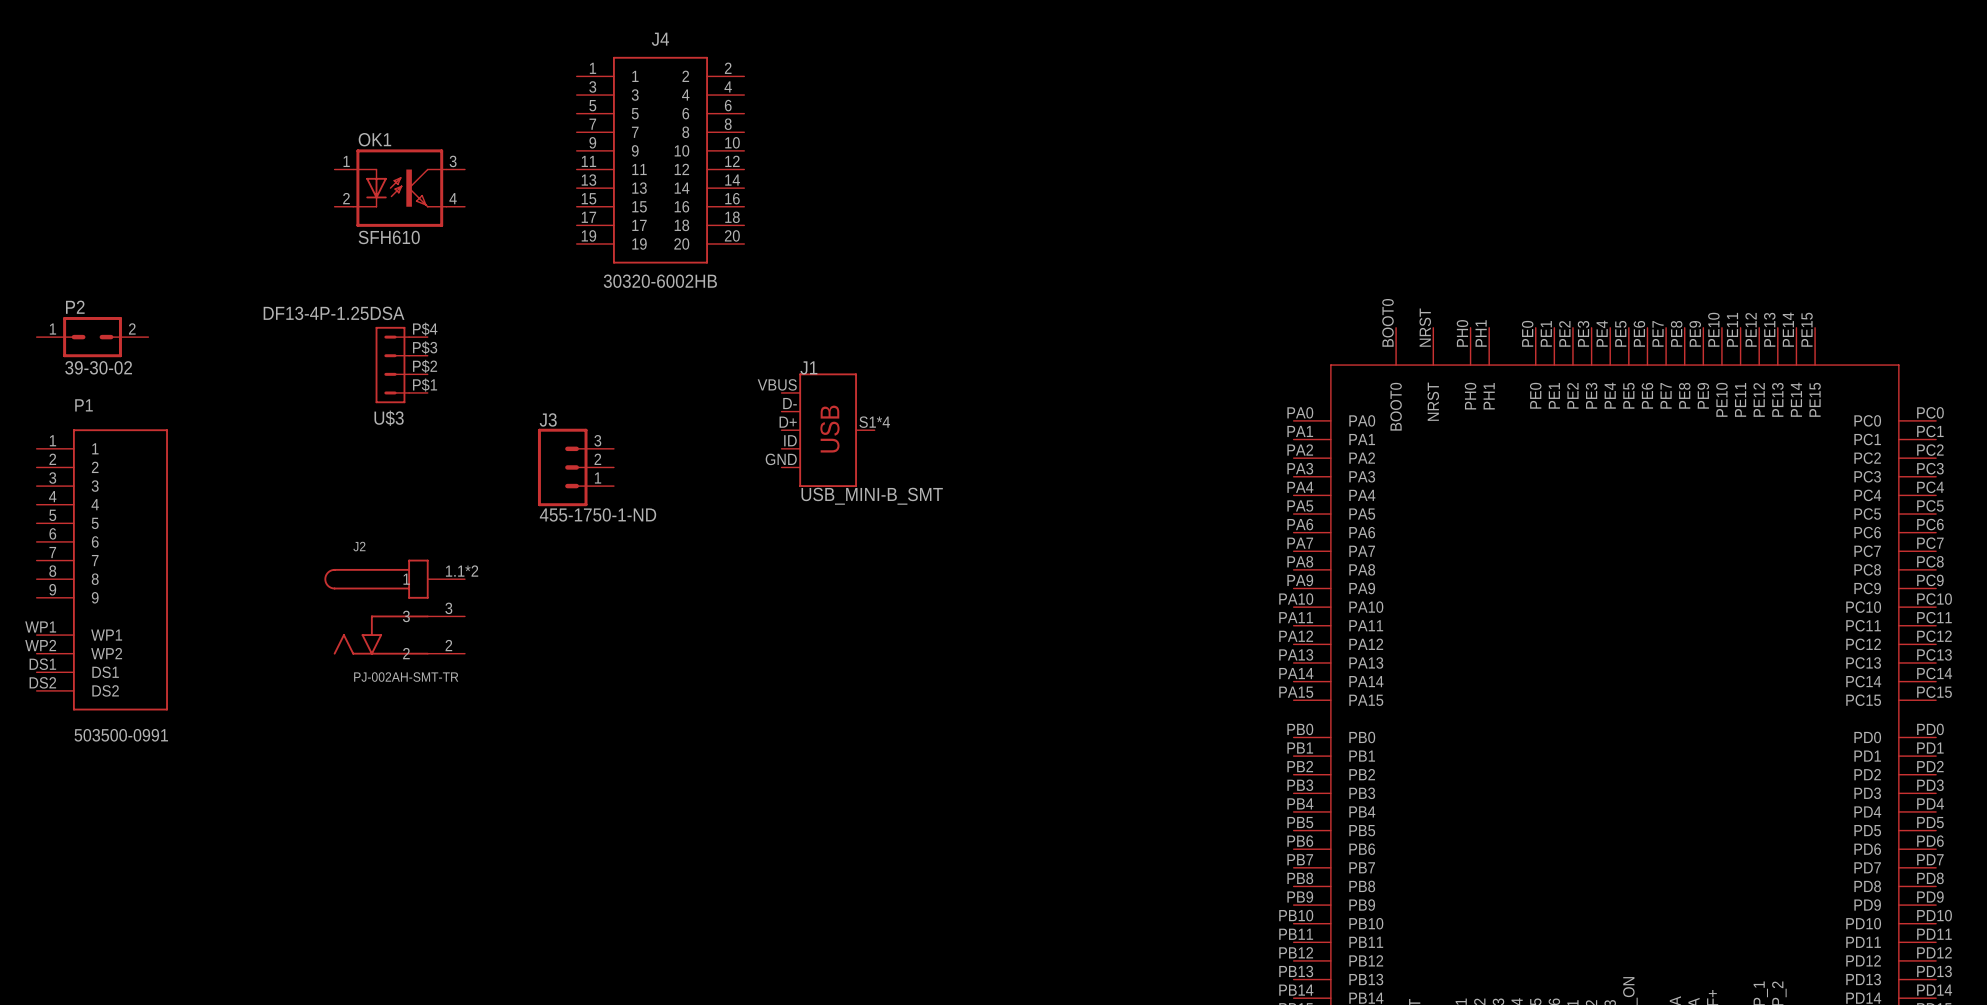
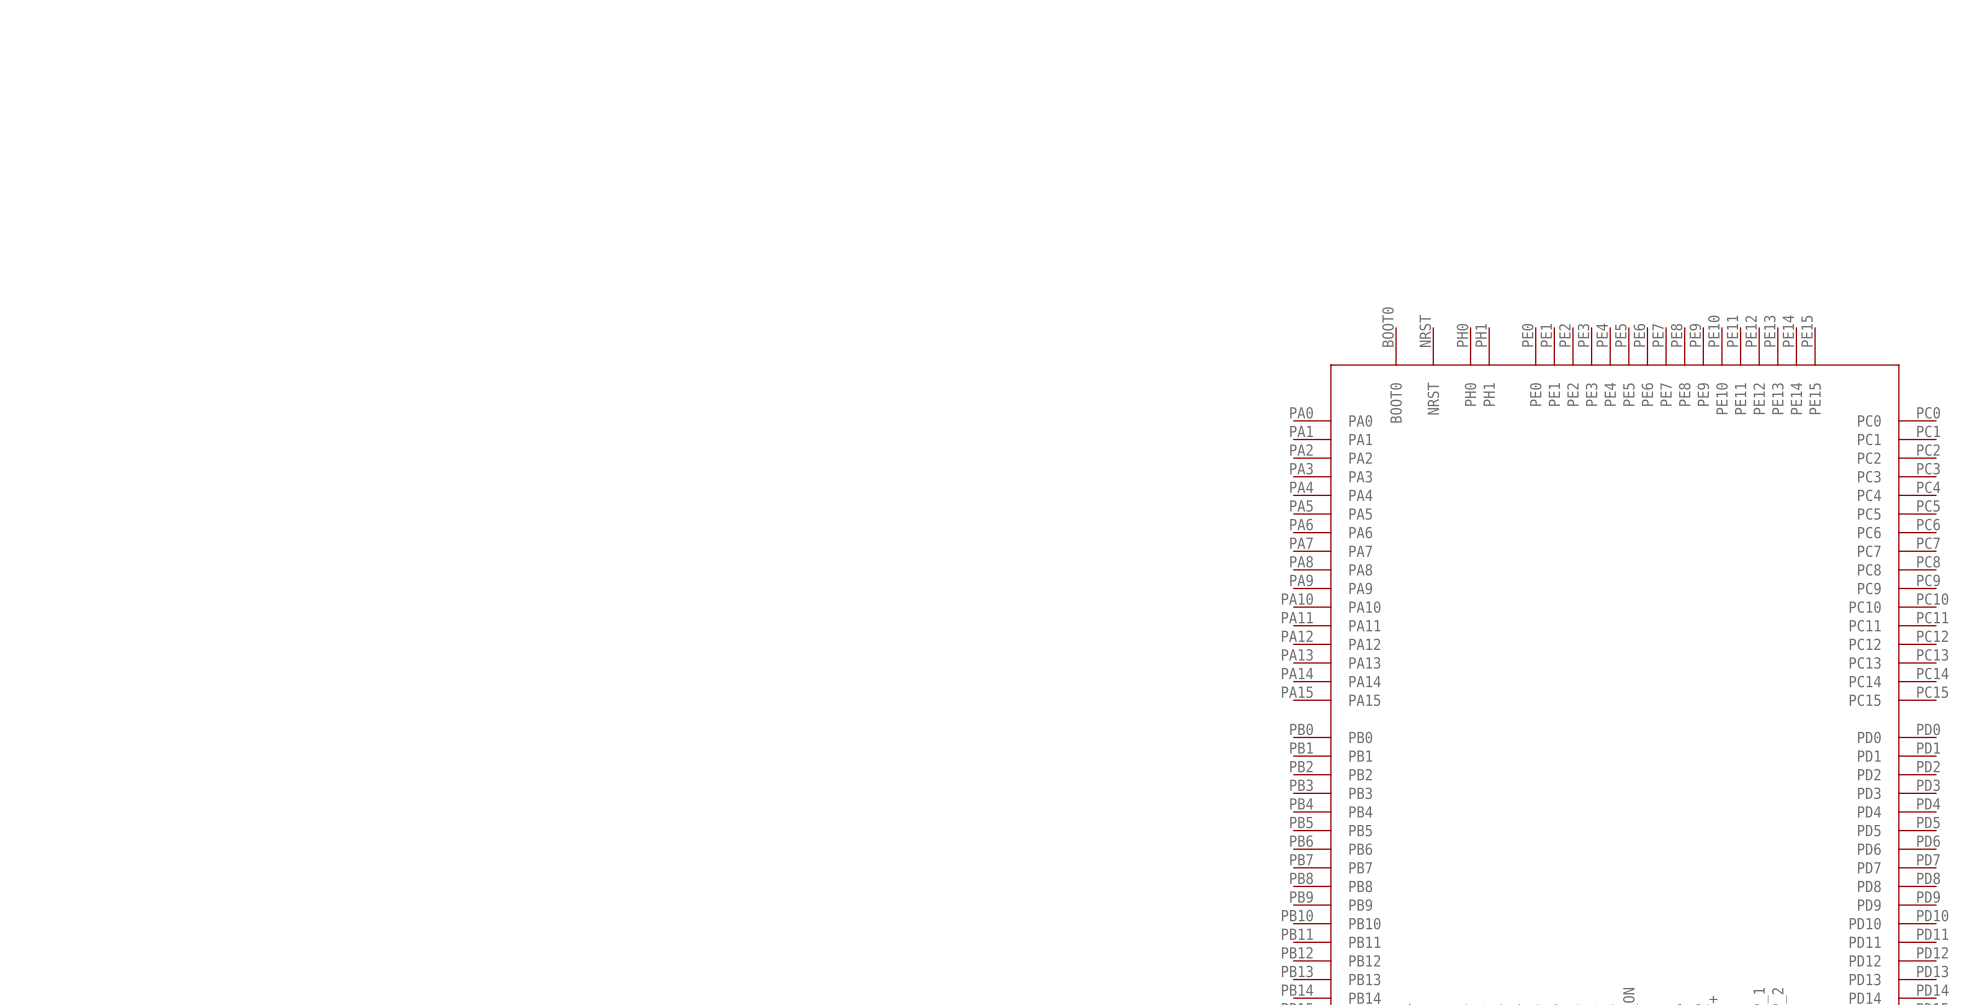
J4: 30320-6002HB (660, 160) -> none
OK1: SFH610 (399, 188) -> none
P2: 39-30-02 (92, 337) -> none
U$3: DF13-4P-1.25DSA (401, 365) -> none
J1: USB_MINI-B_SMT (828, 430) -> none
J3: 455-1750-1-ND (575, 467) -> none
P1: 503500-0991 (102, 569) -> none
J2: PJ-002AH-SMT-TR (394, 607) -> none

